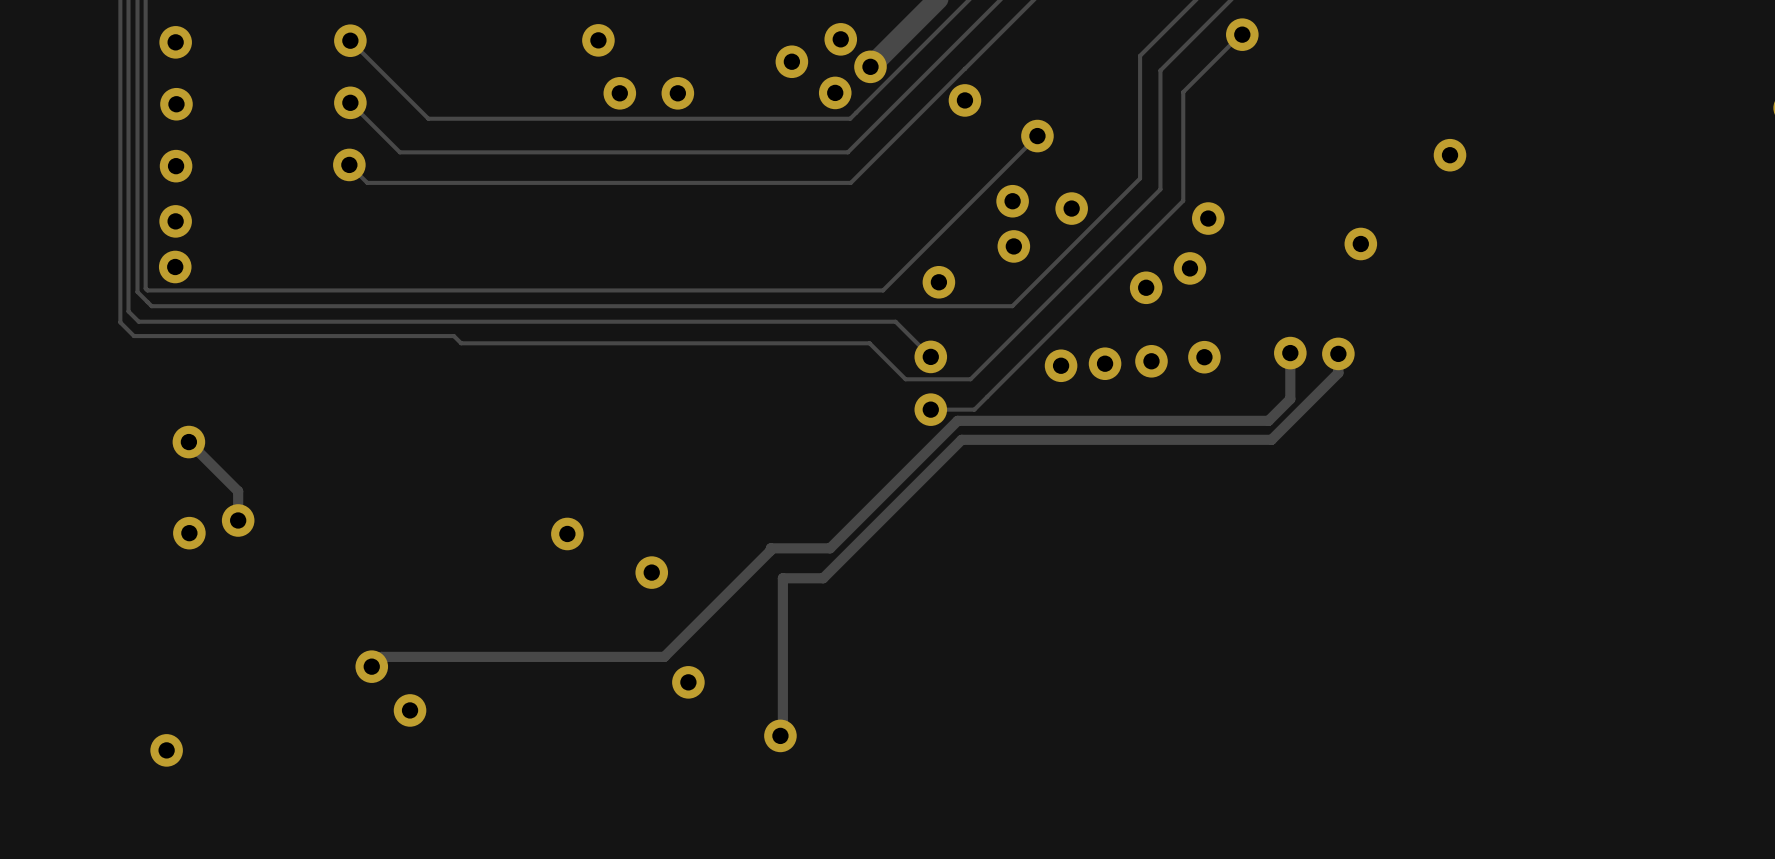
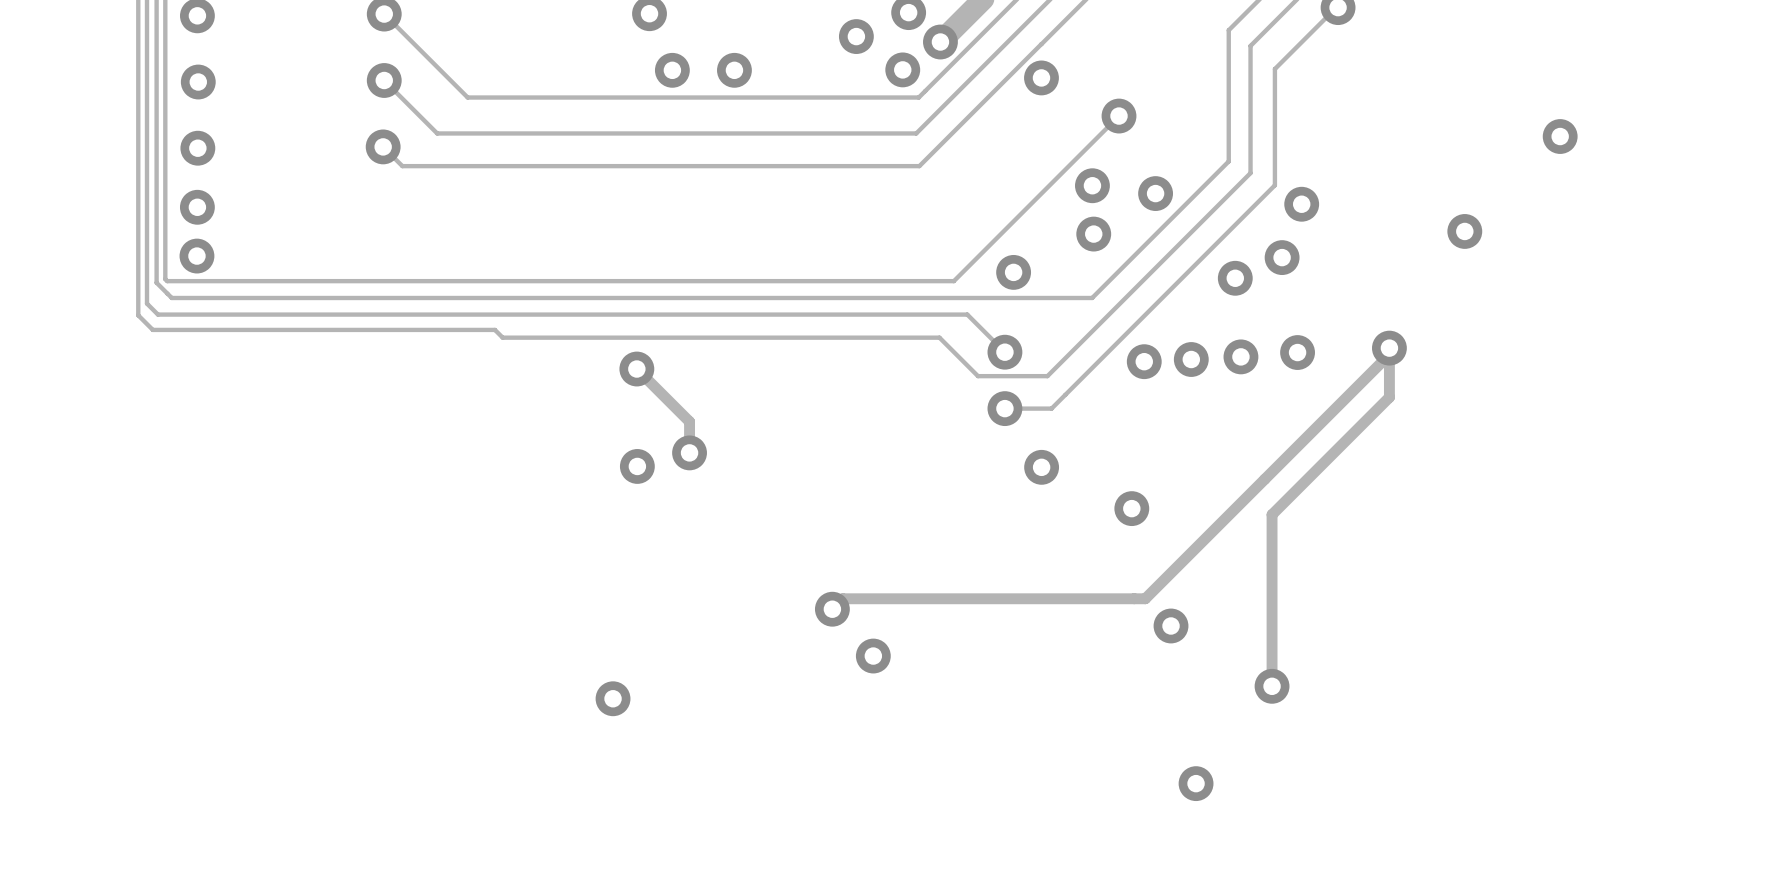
track: (1338, 353) (1338, 373) (1271, 439) (961, 439) (823, 578) (782, 578) (782, 738) (776, 732) -> none
via: (1338, 353) -> none
track: none -> (1393, 350) (1145, 598) (842, 598) (832, 609)
via: none -> (636, 369)
track: (1268, 420) (957, 420) (830, 548) (770, 548) (664, 656) (381, 656) (371, 666) -> (1366, 420) (1272, 514) (1272, 686) (1264, 679)
track: (188, 442) (238, 491) (238, 520) -> (636, 369) (689, 421) (689, 452)
via: (188, 442) -> none
via: none -> (689, 452)
via: none -> (637, 466)
via: none -> (1041, 467)
via: none -> (1131, 508)
via: (238, 520) -> none
via: (189, 533) -> none
via: (567, 533) -> none
via: (651, 572) -> none
via: none -> (832, 609)
via: none -> (1171, 625)
via: none -> (873, 656)
via: (371, 666) -> none
via: none -> (1272, 686)
via: none -> (613, 698)
via: (688, 682) -> none
via: (410, 710) -> none
via: (780, 735) -> none
via: (166, 750) -> none
via: none -> (1196, 783)

